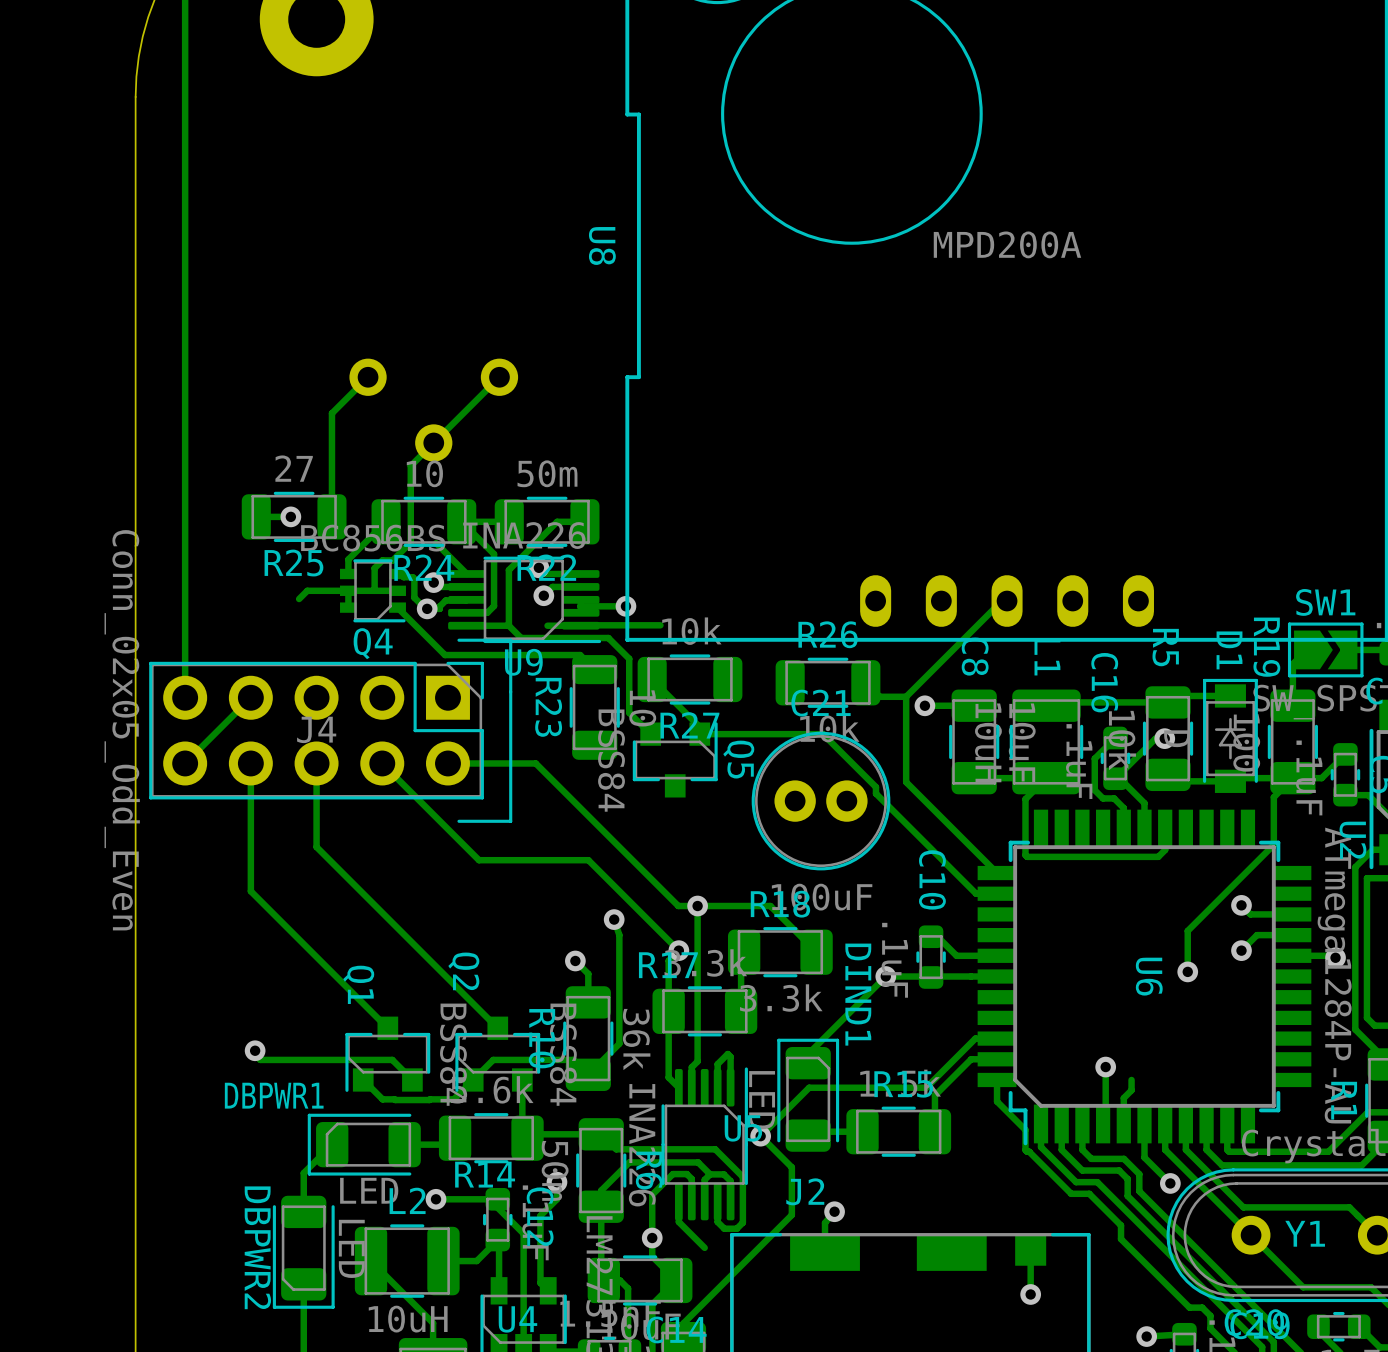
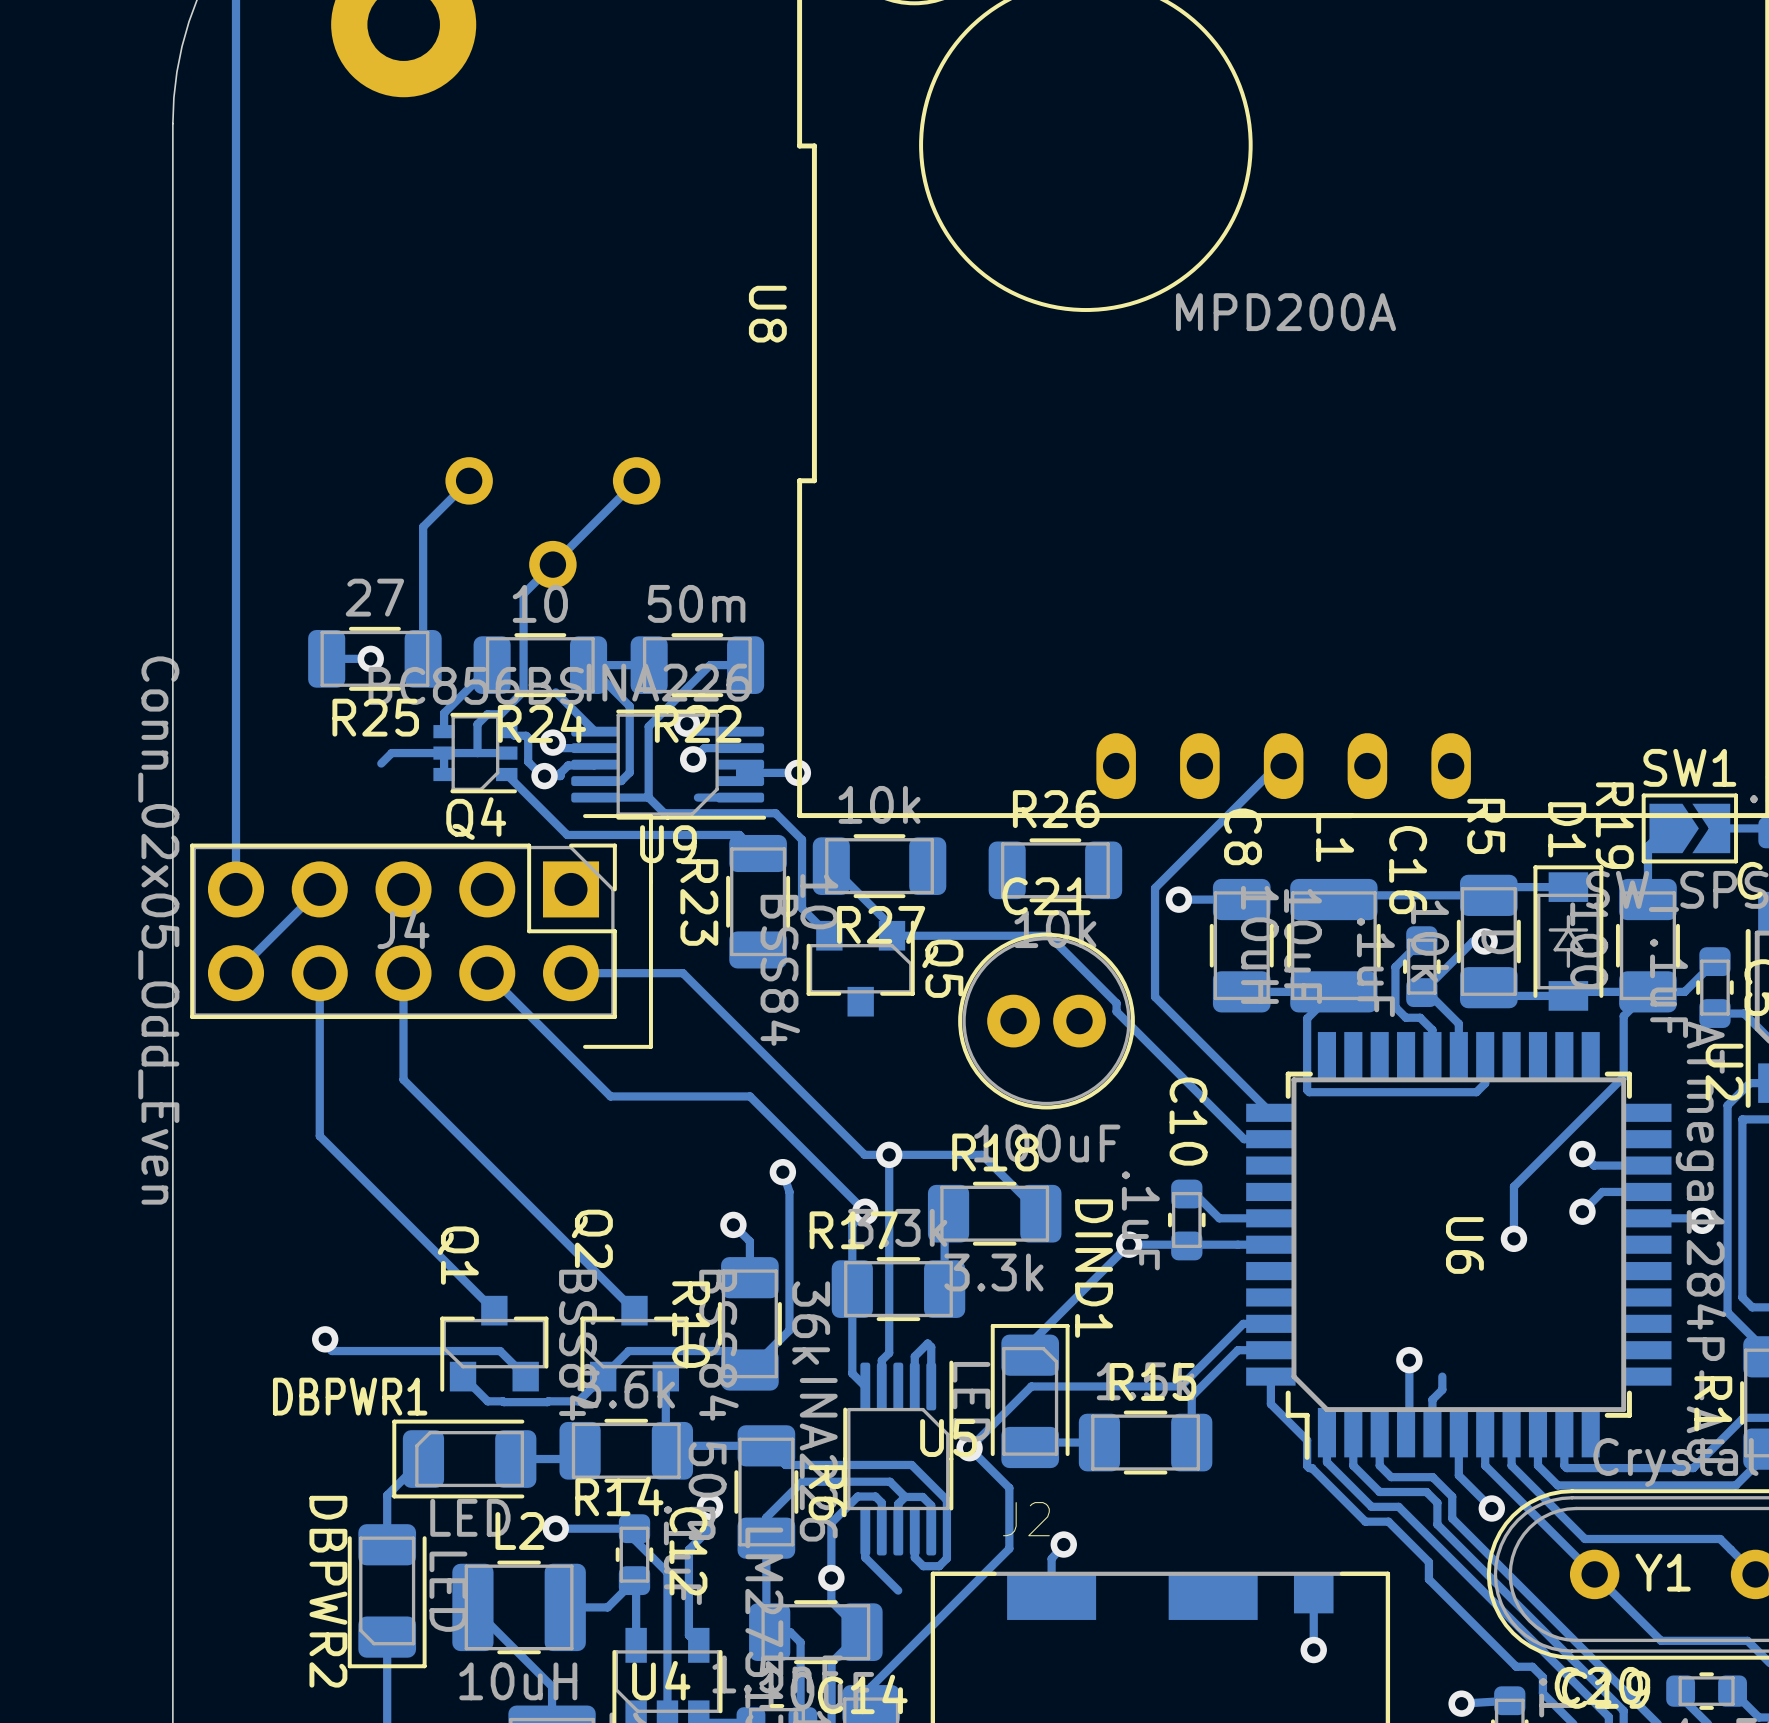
track: (660, 625) (580, 625) -> none
track: (865, 682) (879, 696) (906, 696) -> none

